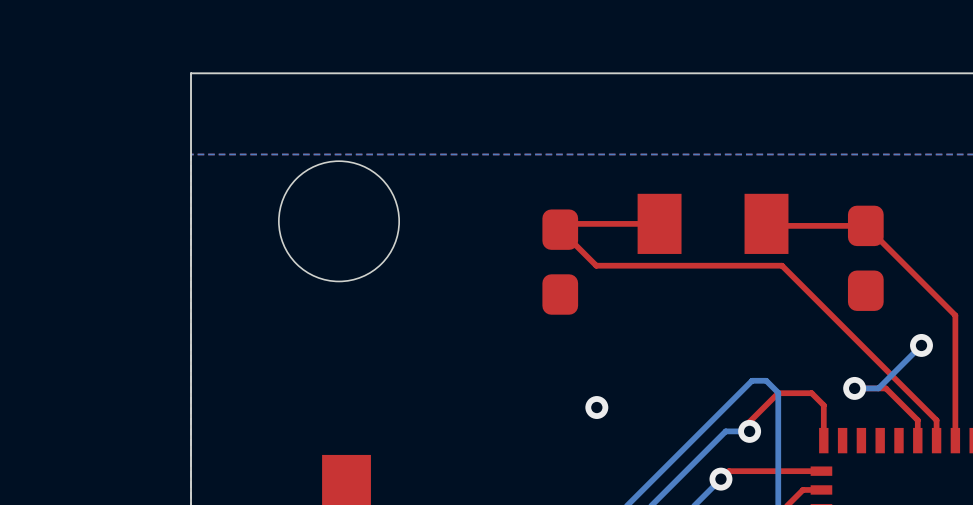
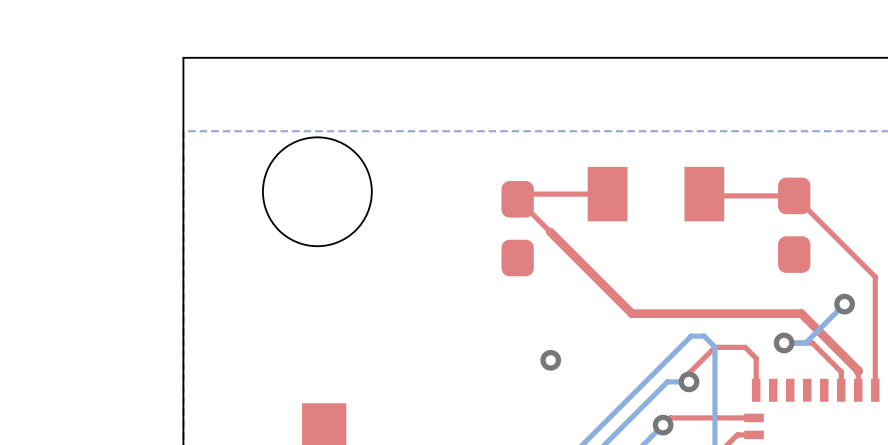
top track: (596, 265) (782, 265) (936, 420) -> (550, 231) (631, 313) (801, 313) (858, 371)

